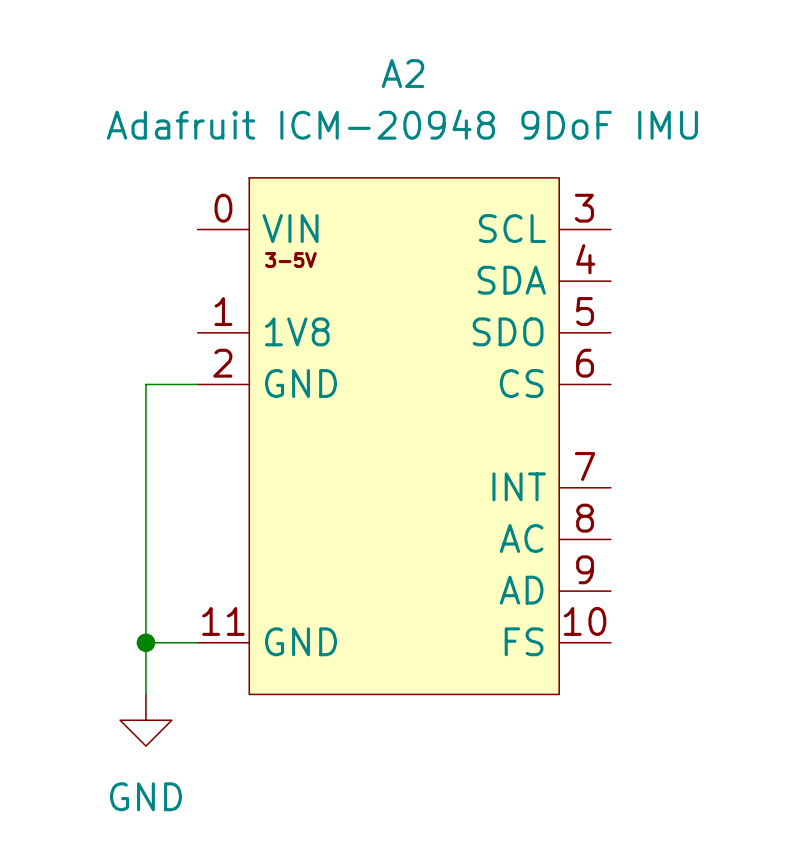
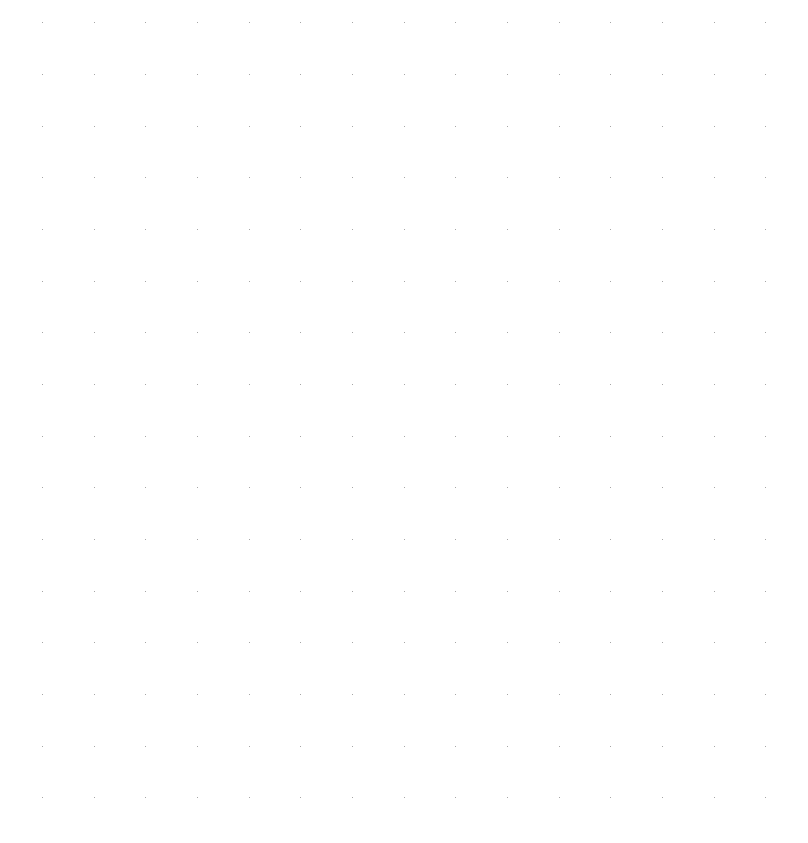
wire: (197, 384) (145, 384) (145, 694) -> none
A2: Adafruit ICM-20948 9DoF IMU (404, 436) -> none
wire: (145, 642) (197, 642) -> none
junction: (145, 642) -> none
power symbol: GND (145, 720) -> none

